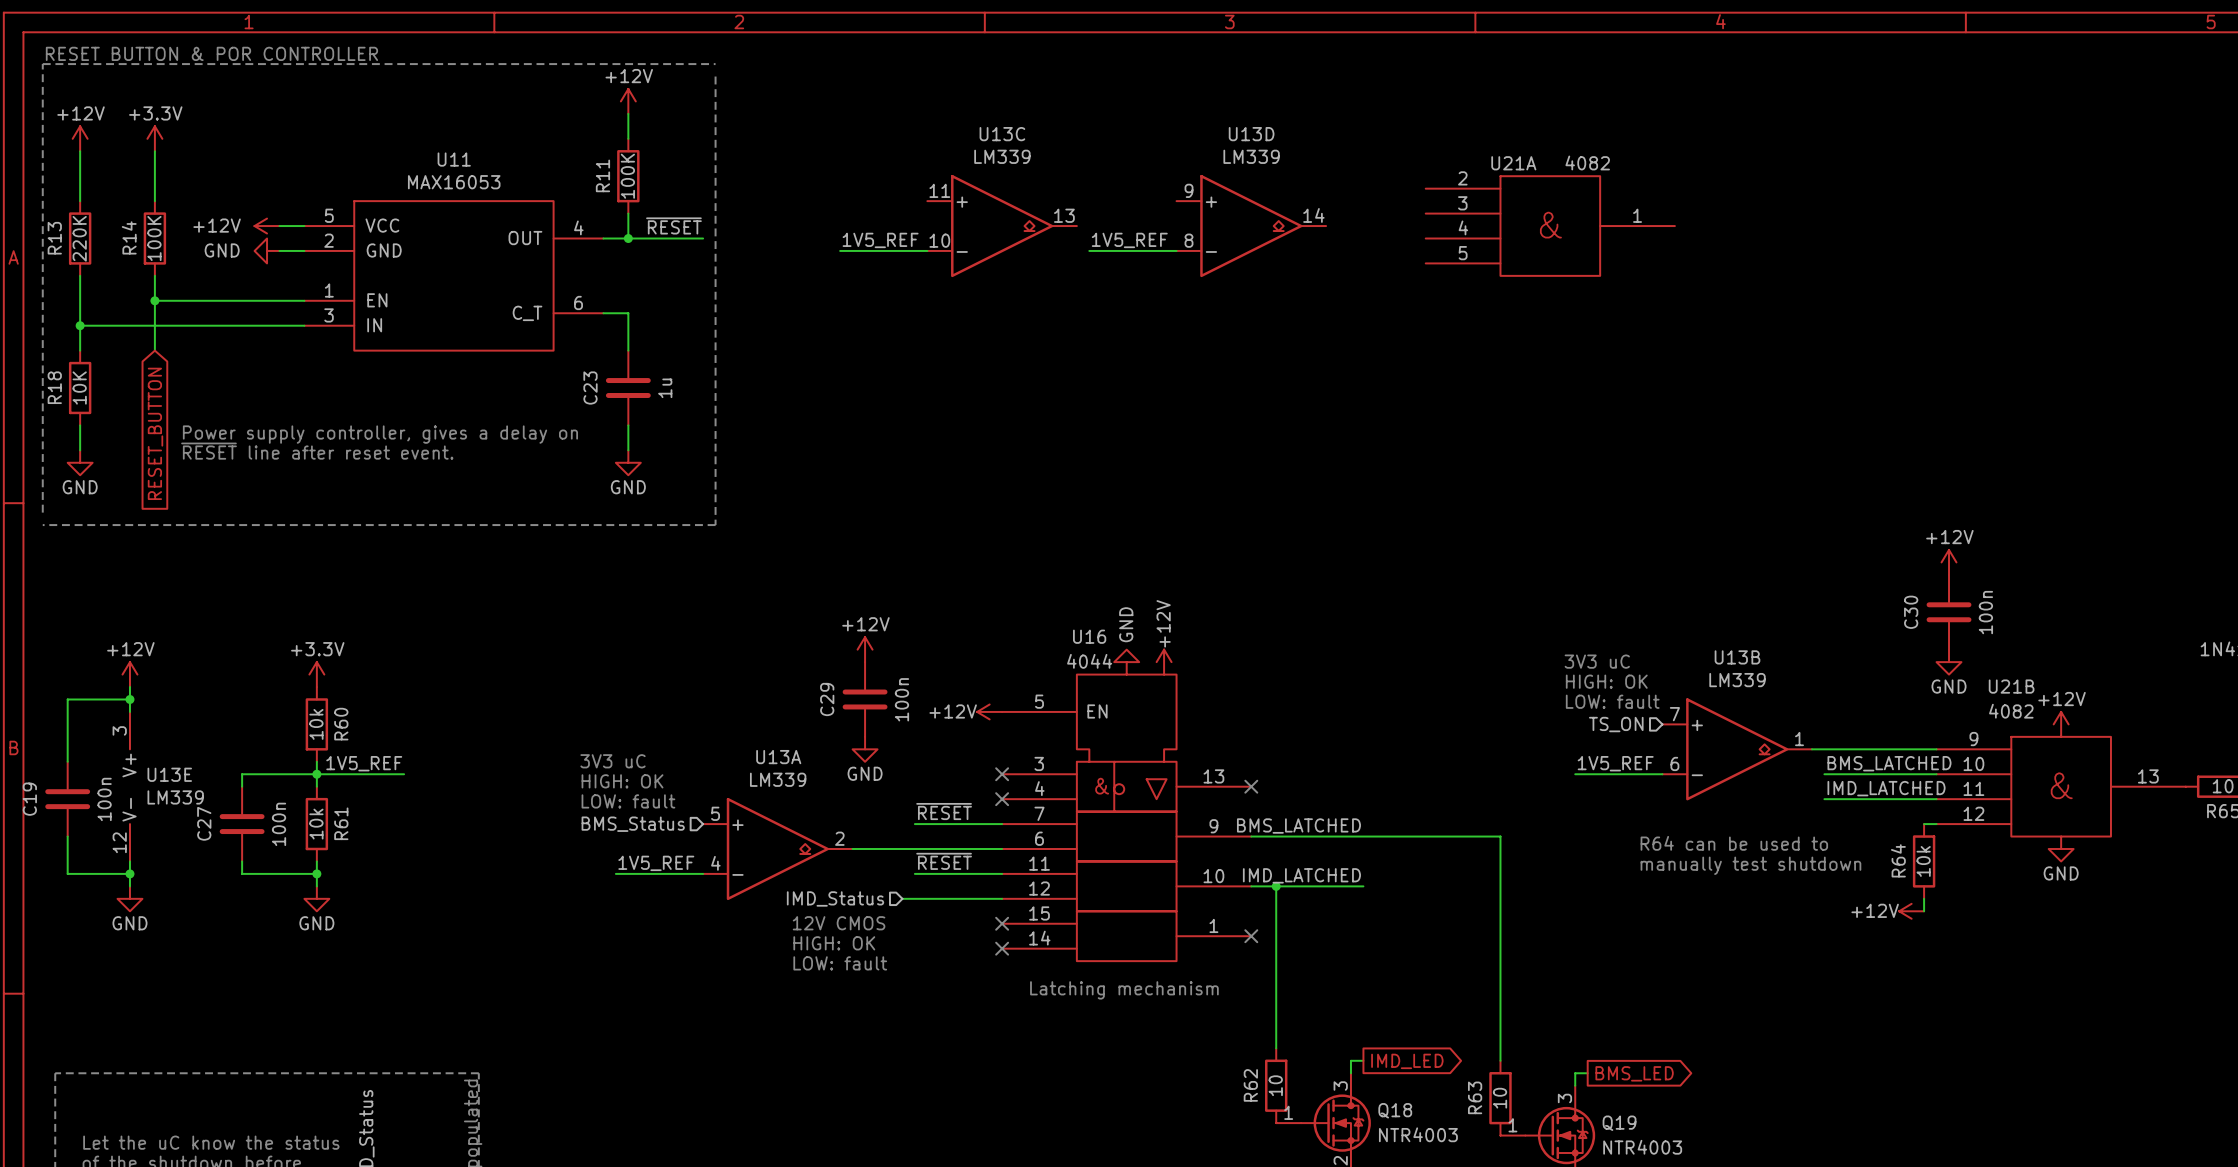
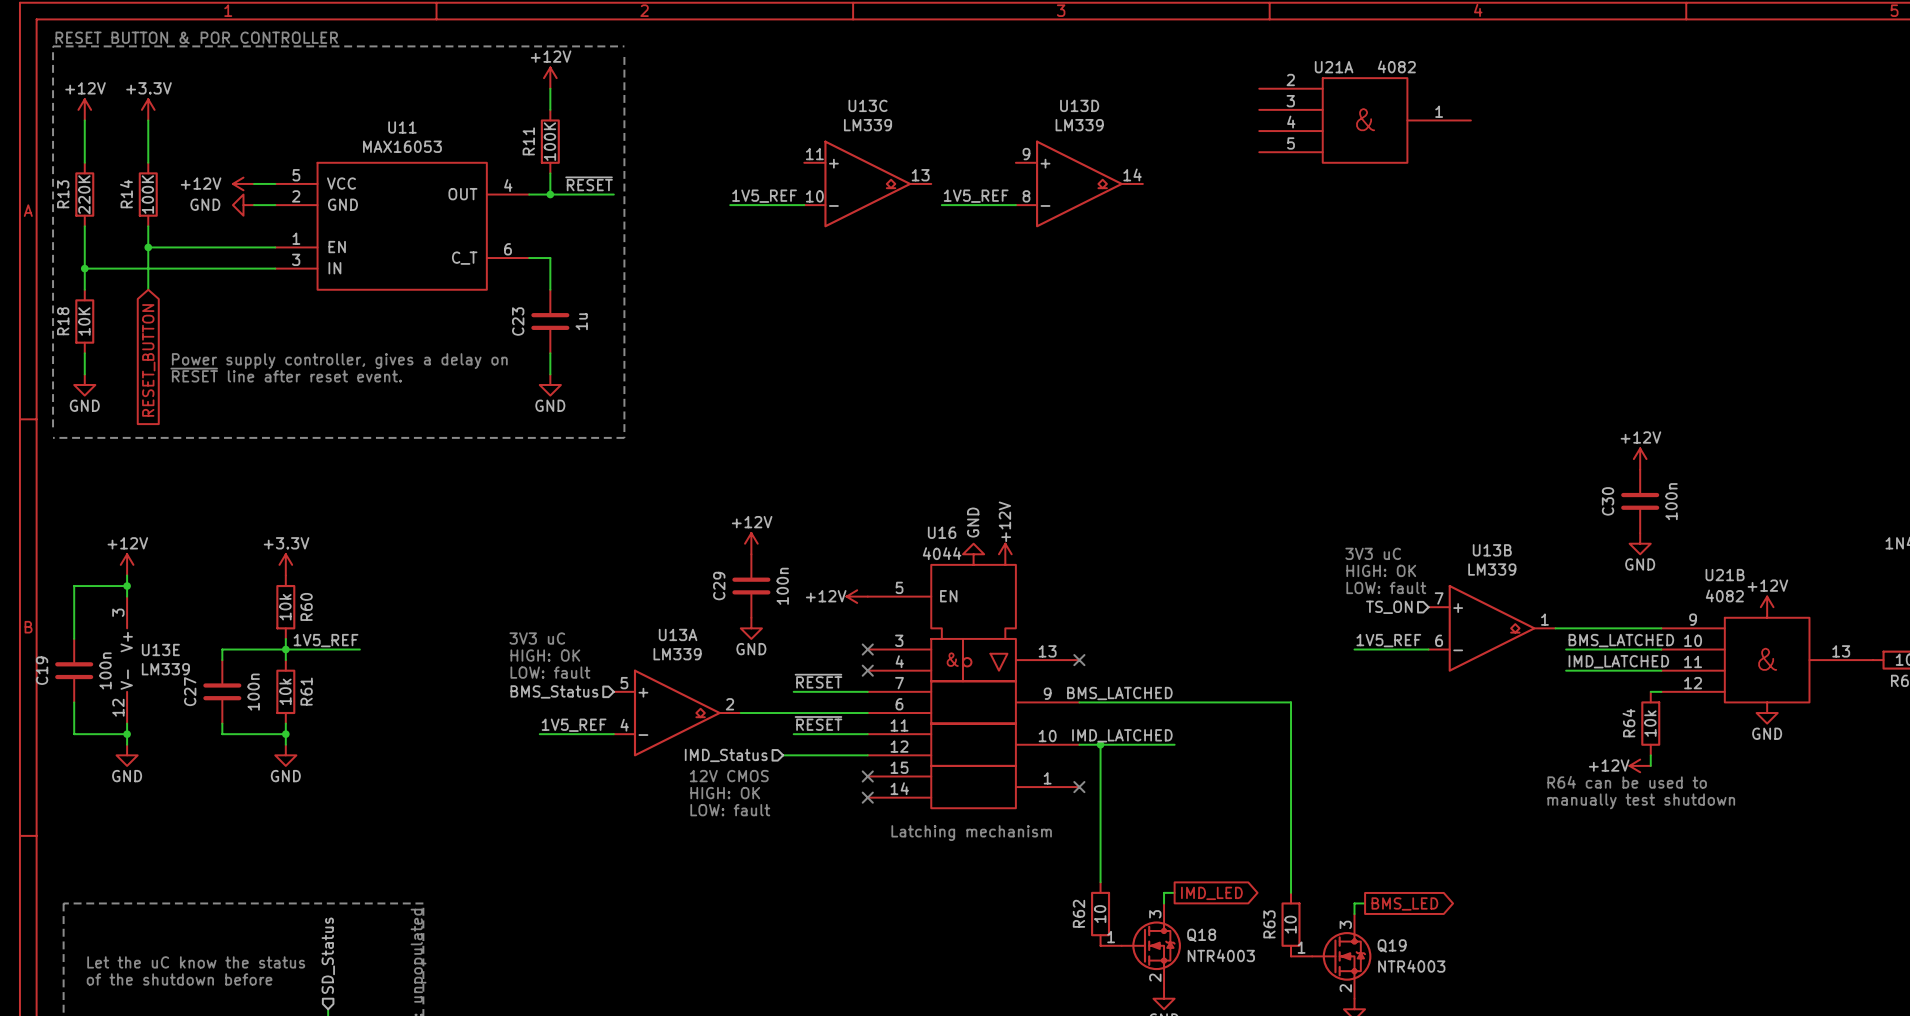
U21A position: (1550, 226) -> (1365, 120)
power symbol position: +12V (1949, 562) -> +12V (1640, 459)
C30 position: (1949, 612) -> (1640, 501)
power symbol position: GND (1949, 662) -> GND (1640, 543)
text position: R64 can be used to (1734, 843) -> R64 can be used to (1627, 782)
text position: manually test shutdown (1750, 865) -> manually test shutdown (1641, 801)

